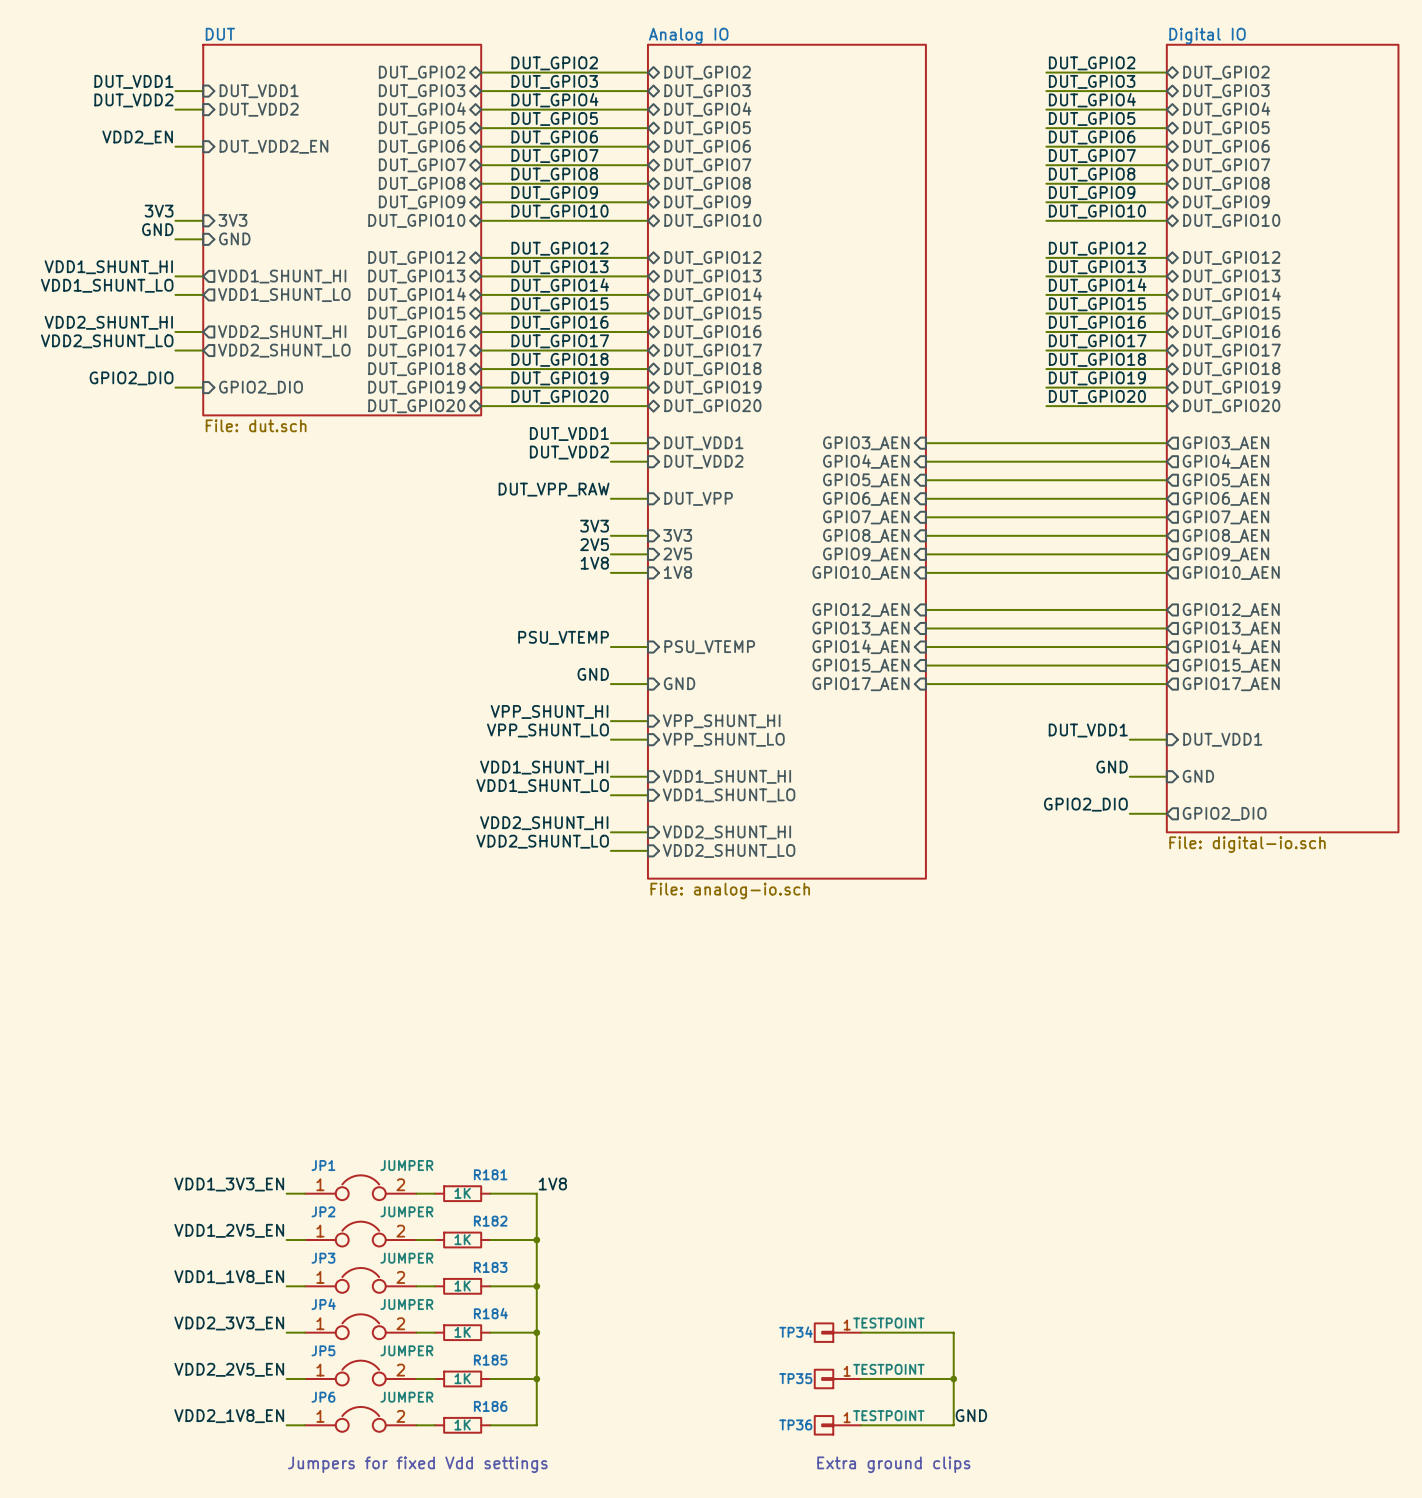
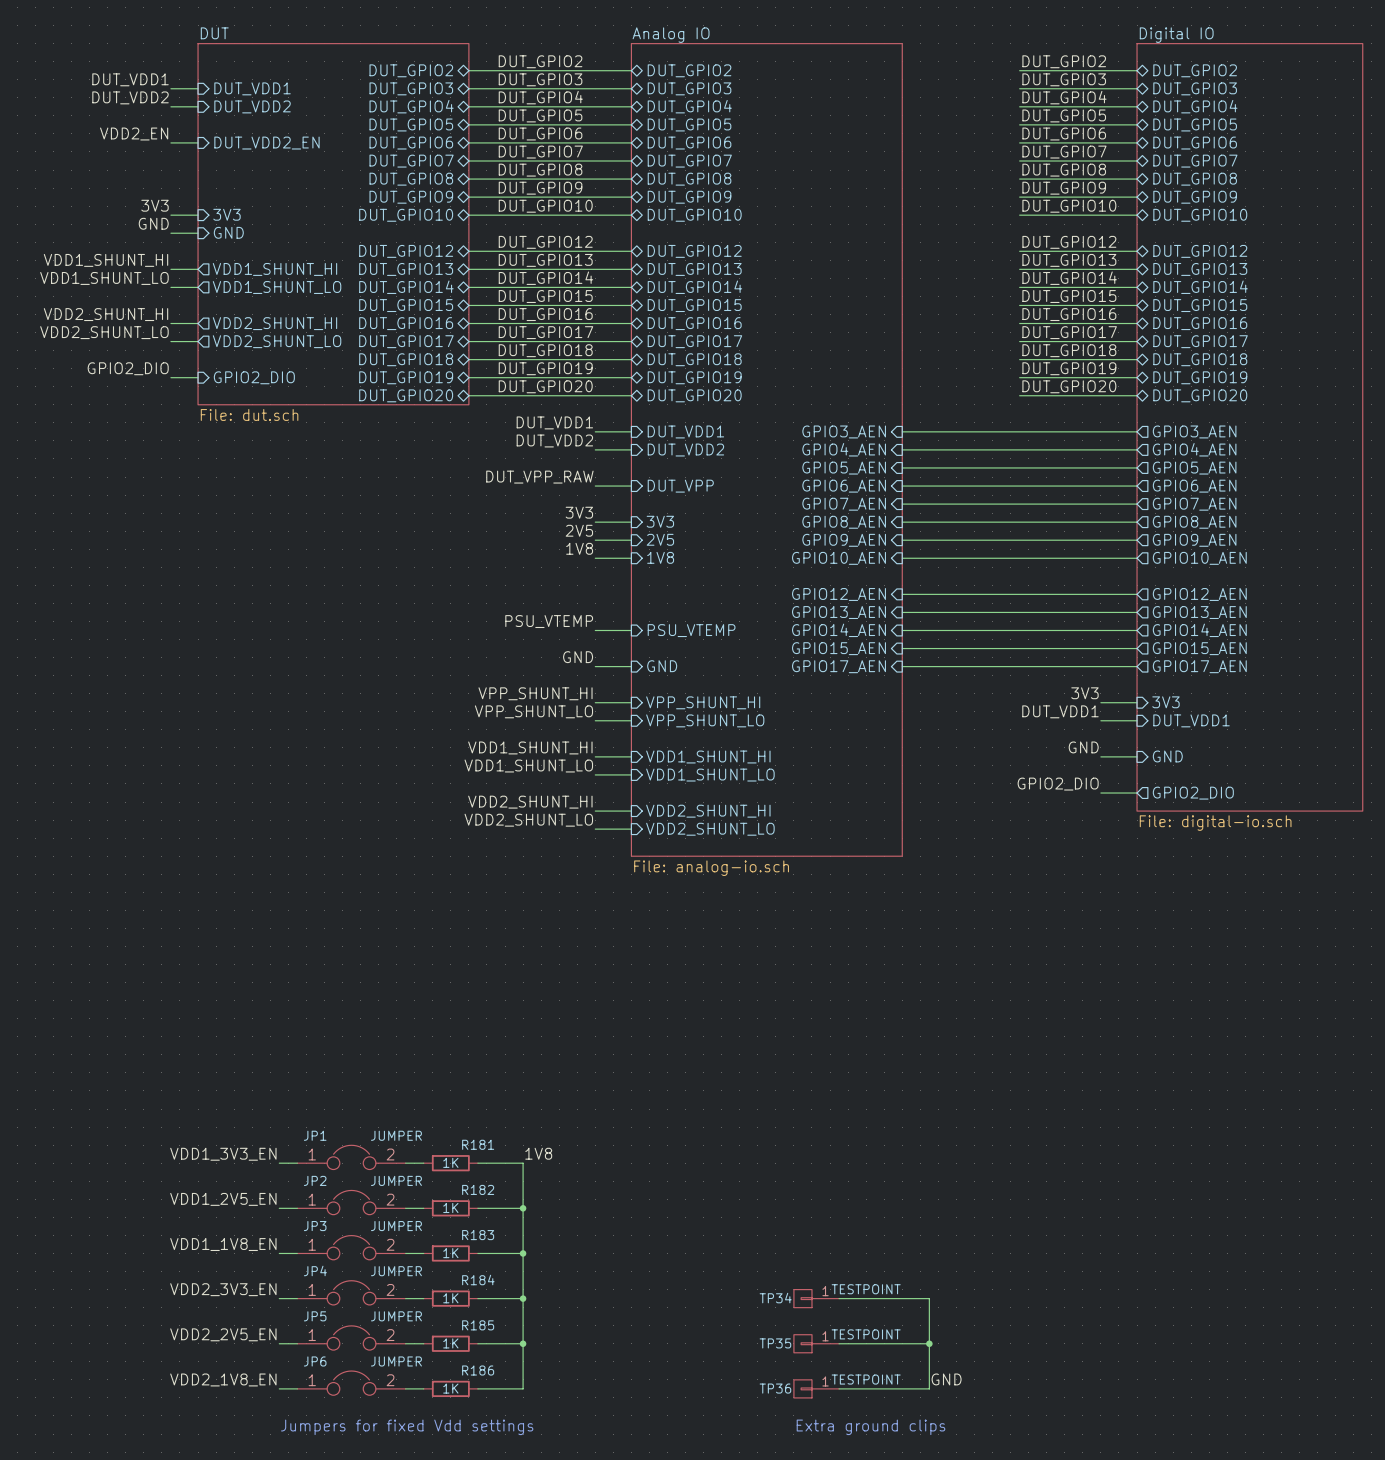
label: none -> 3V3 (1084, 693)
sheet pin: none -> 3V3 (1165, 702)
wire: none -> (1100, 702) (1137, 702)

